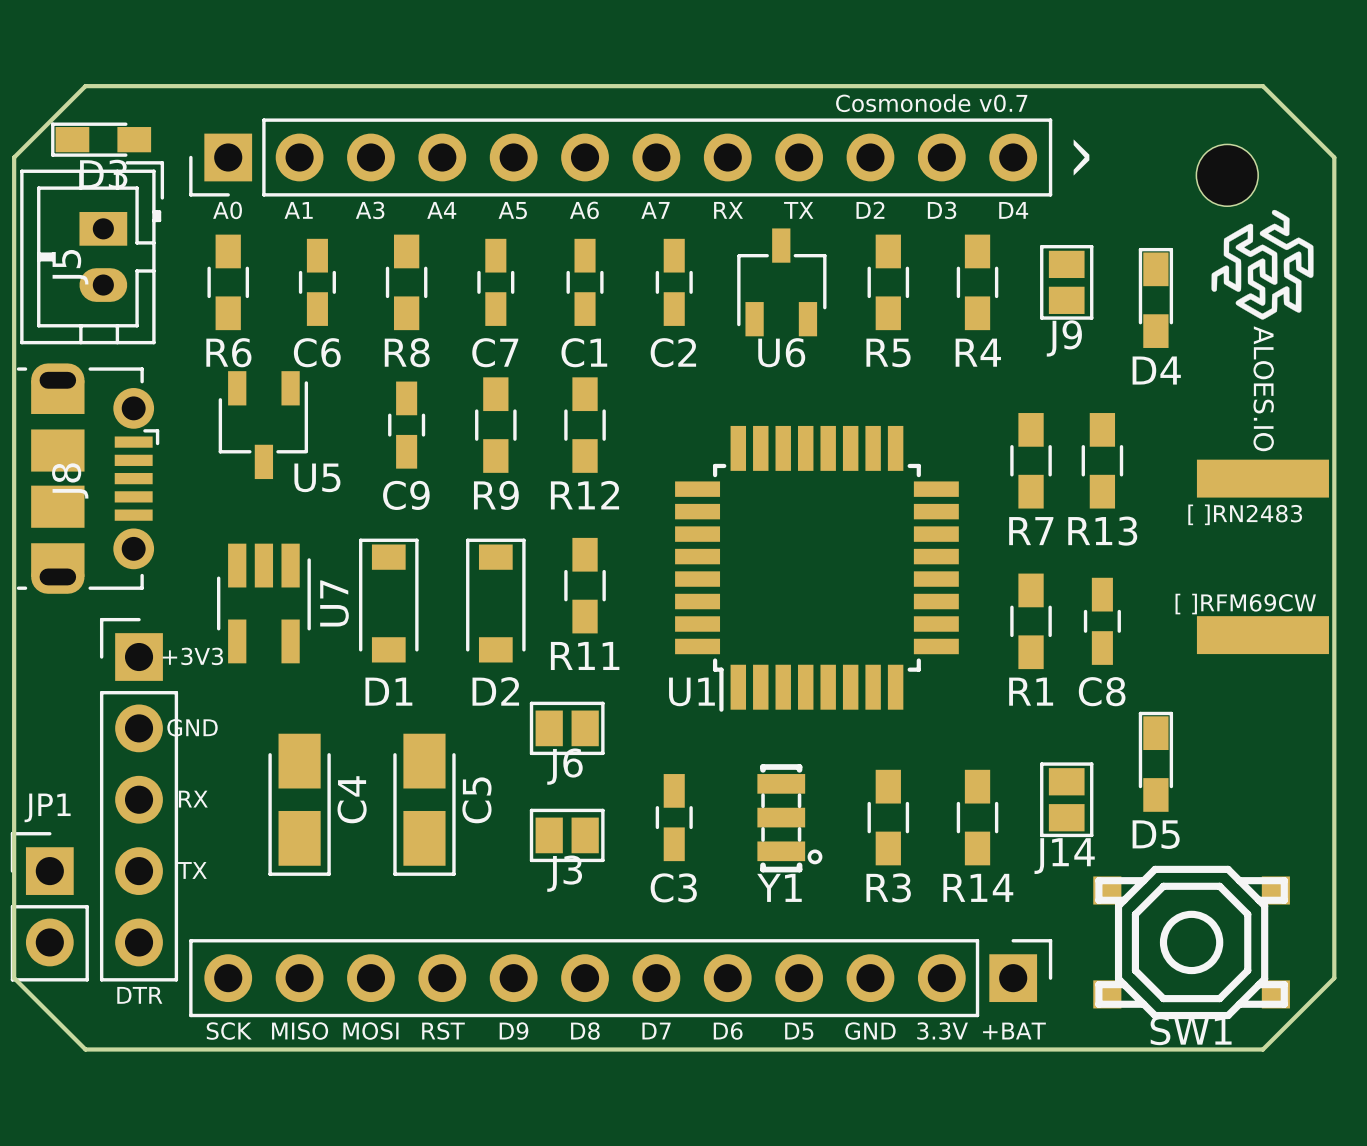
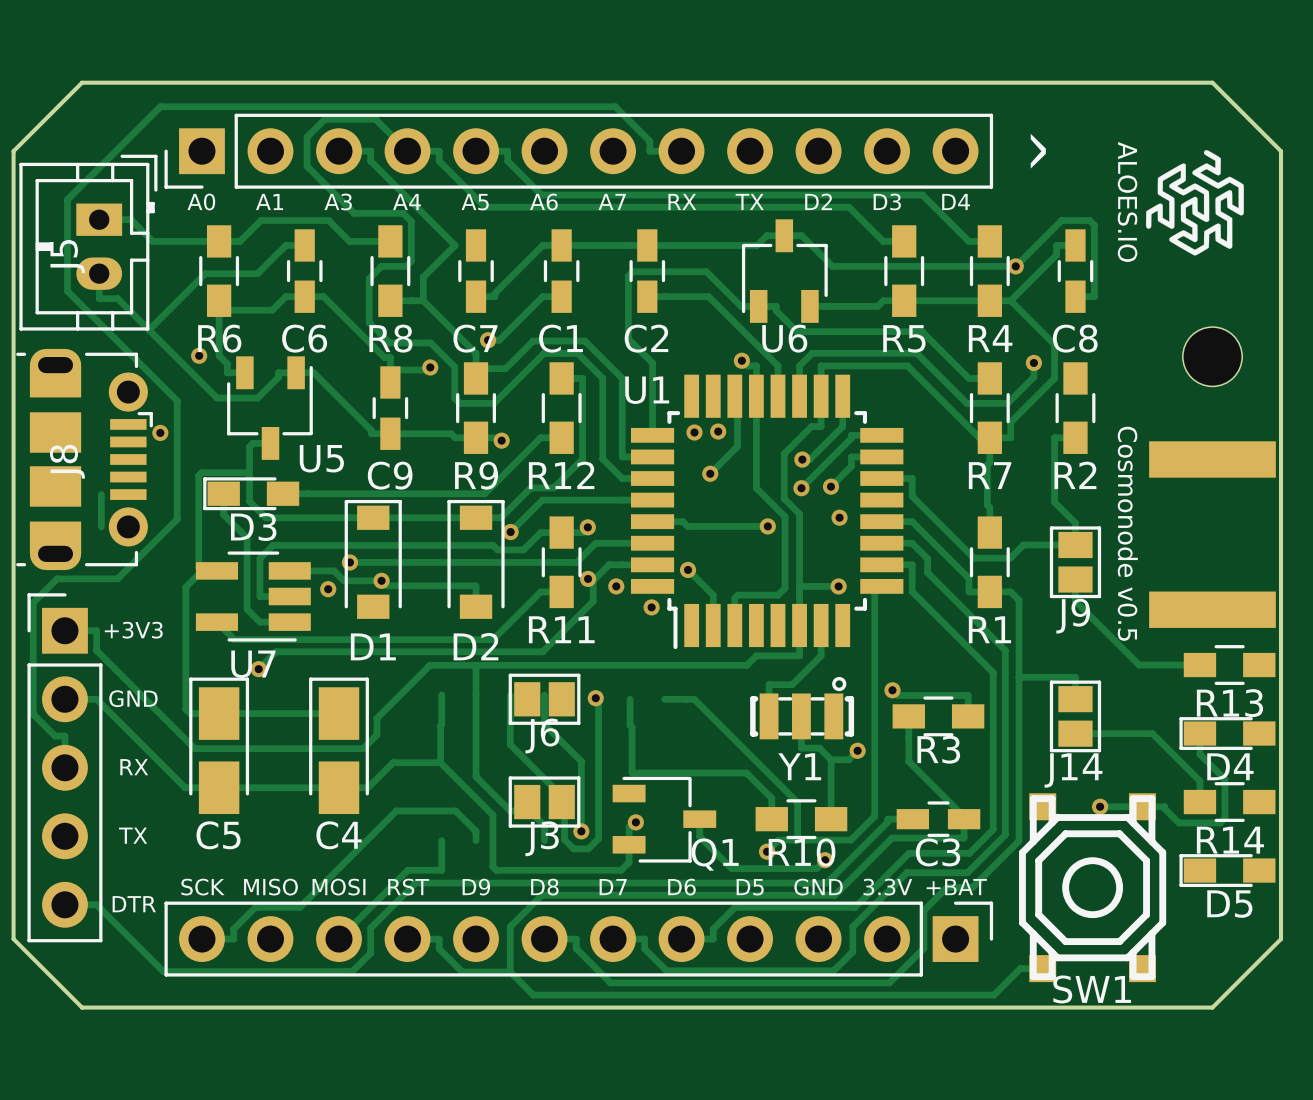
text: Cosmonode v0.7 (931, 103) -> none
D3 position: (101, 139) -> (251, 493)
track: none -> (339, 151) (370, 151) (370, 161) (455, 245) (423, 277) (423, 300)
track: none -> (476, 151) (507, 151) (507, 161) (541, 195) (922, 195) (968, 241) (989, 241)
part position: (620, 157) -> (578, 151)
track: none -> (681, 151) (649, 151) (649, 141) (615, 106) (160, 106) (67, 199) (67, 291) (177, 400) (177, 519) (117, 578) (57, 578) (33, 602) (33, 714) (55, 736) (64, 736) (64, 767)
part position: (1227, 175) -> (1212, 356)
text position: A0 (227, 210) -> A0 (201, 201)
text position: A1 (298, 210) -> A1 (269, 201)
text position: A3 (370, 210) -> A3 (338, 201)
text position: A4 (441, 210) -> A4 (406, 201)
text position: A5 (512, 210) -> A5 (475, 202)
text position: A6 (584, 210) -> A6 (543, 201)
text position: A7 (655, 210) -> A7 (612, 201)
text position: RX (728, 210) -> RX (682, 201)
text position: TX (798, 210) -> TX (749, 201)
text position: D2 (870, 210) -> D2 (818, 201)
text position: D3 (942, 210) -> D3 (887, 201)
text position: D4 (1013, 210) -> D4 (956, 201)
track: none -> (99, 219) (130, 219) (152, 241) (240, 241) (260, 220) (328, 220) (349, 241) (390, 241)
track: none -> (904, 241) (883, 241) (849, 207) (485, 207) (439, 161) (439, 151) (407, 151) (375, 119) (324, 119) (307, 137) (307, 166) (354, 213) (403, 213) (411, 221) (411, 261) (406, 266) (381, 266) (369, 278) (369, 322) (389, 342) (430, 342) (454, 367) (454, 398) (459, 403) (494, 403) (543, 353) (577, 353) (602, 378) (602, 459) (622, 478) (652, 478)
track: none -> (304, 245) (285, 245) (257, 273) (205, 273) (149, 329)
track: none -> (1075, 245) (1056, 245) (1056, 254) (1010, 300)
drawing position: (1262, 264) -> (1194, 202)
via: none -> (1015, 266)
U6 position: (781, 282) -> (784, 271)
R5 position: (888, 282) -> (904, 271)
R4 position: (977, 282) -> (989, 271)
J9 position: (1066, 282) -> (1075, 562)
track: none -> (99, 273) (99, 298) (117, 298) (217, 398) (257, 398) (278, 377) (278, 372) (313, 372) (371, 430) (371, 433) (451, 433) (455, 437) (496, 437) (501, 440)
D4 rotation: 0° (1155, 297) -> 90° counterclockwise (1227, 733)
D4 position: (1155, 297) -> (1227, 733)
track: none -> (476, 296) (494, 296) (494, 293) (542, 245) (757, 245) (766, 235) (801, 235) (832, 266) (1015, 266) (1061, 220) (1089, 220) (1094, 225) (1094, 296) (1075, 296)
track: none -> (561, 296) (542, 296) (499, 340) (488, 340)
track: none -> (647, 296) (708, 296) (777, 365) (777, 396)
track: none -> (219, 300) (219, 355) (227, 364) (227, 372) (244, 372)
track: none -> (390, 300) (423, 300)
track: none -> (423, 300) (476, 353) (476, 378)
track: none -> (1010, 300) (883, 300) (877, 306) (809, 306)
track: none -> (1010, 300) (1054, 344) (1054, 378) (1010, 422) (1010, 437) (979, 437) (907, 365) (821, 365) (821, 426) (811, 426) (784, 453) (784, 498) (799, 514) (799, 655) (756, 655) (746, 665) (429, 665) (376, 718) (376, 734) (363, 748) (194, 748) (96, 650) (96, 630) (64, 630)
track: none -> (219, 310) (272, 310) (285, 296) (323, 296) (384, 357) (390, 357) (390, 382)
via: none -> (488, 340)
via: none -> (199, 355)
track: none -> (741, 360) (747, 365) (756, 365) (756, 488) (785, 516) (785, 588) (777, 595) (737, 595) (734, 598) (734, 625)
via: none -> (741, 360)
track: none -> (1033, 362) (1033, 377) (1007, 403) (966, 403) (916, 353) (812, 353) (799, 365) (799, 396)
via: none -> (1033, 362)
track: none -> (430, 367) (427, 370) (390, 370)
via: none -> (430, 367)
track: none -> (476, 368) (505, 368) (533, 341) (584, 341) (622, 378) (622, 456) (652, 456)
text position: ALOES.IO (1263, 388) -> ALOES.IO (1127, 201)
track: none -> (561, 378) (582, 378) (582, 459) (553, 487) (530, 487) (500, 517) (265, 517) (249, 501) (249, 446) (252, 443) (270, 443)
track: none -> (989, 378) (968, 378) (922, 331) (797, 331) (776, 310) (776, 306) (741, 306) (706, 271) (632, 271) (628, 276) (628, 339) (652, 363) (652, 435)
track: none -> (734, 396) (737, 398) (737, 446) (710, 473)
track: none -> (842, 396) (842, 426) (809, 459) (802, 459)
U5 position: (263, 425) -> (269, 408)
R2: none -> (1075, 408)
via: none -> (718, 431)
via: none -> (160, 432)
via: none -> (694, 432)
track: none -> (881, 435) (851, 435) (851, 438) (801, 488)
track: none -> (561, 437) (540, 437) (484, 493) (283, 493)
track: none -> (989, 437) (989, 462) (987, 465) (989, 532)
track: none -> (1075, 437) (1054, 437) (1054, 502) (1075, 523) (1075, 545) (1023, 545) (1010, 558) (973, 558) (912, 496) (912, 478) (881, 478)
via: none -> (501, 440)
R7 position: (1031, 460) -> (989, 408)
R13 rotation: 0° (1102, 460) -> 90° clockwise (1229, 665)
R13 position: (1102, 460) -> (1229, 665)
track: none -> (881, 456) (851, 456) (851, 466) (830, 486)
via: none -> (802, 459)
track: none -> (249, 472) (201, 472) (198, 475) (198, 567) (202, 570)
via: none -> (710, 473)
via: none -> (830, 486)
via: none -> (801, 488)
track: none -> (223, 493) (223, 514) (247, 538) (247, 609) (259, 622) (289, 622)
text: [ ]RN2483 (1245, 514) -> none
track: none -> (101, 494) (101, 526)
track: none -> (652, 500) (542, 500) (510, 532)
via: none -> (839, 517)
track: none -> (652, 521) (682, 521) (687, 526) (767, 526)
track: none -> (881, 521) (912, 521) (968, 578) (968, 591) (1010, 591) (1018, 600) (1018, 841) (972, 887) (946, 887) (923, 910) (923, 948) (889, 982) (610, 982) (576, 948) (576, 939) (544, 939)
via: none -> (767, 526)
track: none -> (587, 527) (582, 532) (540, 532) (523, 549) (497, 549) (493, 545) (272, 545) (259, 558) (259, 596) (289, 596)
via: none -> (587, 527)
via: none -> (510, 532)
text: none -> Cosmonode v0.5 (1127, 533)
track: none -> (652, 543) (595, 543) (576, 562) (349, 562)
track: none -> (881, 543) (912, 543) (927, 558) (927, 572) (1005, 650) (1005, 834) (967, 872) (906, 872) (852, 926) (852, 951) (833, 970) (666, 970) (644, 948) (644, 939) (613, 939)
U1 position: (816, 568) -> (767, 511)
via: none -> (349, 562)
track: none -> (652, 564) (609, 564) (593, 580)
track: none -> (881, 564) (912, 564) (912, 591) (993, 672) (993, 829) (969, 853) (909, 853) (855, 907) (735, 907) (713, 929) (713, 939) (681, 939)
track: none -> (688, 569) (713, 595) (713, 625)
via: none -> (688, 569)
track: none -> (202, 570) (185, 587) (185, 709) (190, 713) (339, 713)
track: none -> (289, 570) (334, 570) (344, 580) (381, 580) (386, 585) (476, 585) (476, 606)
D1 position: (388, 600) -> (373, 559)
D2 position: (495, 600) -> (476, 559)
U7 rotation: 0° (263, 603) -> 90° clockwise (253, 596)
via: none -> (588, 578)
track: none -> (1075, 579) (1075, 601) (1139, 665) (1199, 665)
via: none -> (381, 580)
track: none -> (593, 580) (593, 601) (542, 651) (276, 651) (258, 669)
text: [ ]RFM69CW (1245, 604) -> none
via: none -> (616, 586)
track: none -> (799, 586) (838, 586)
via: none -> (838, 586)
track: none -> (881, 586) (874, 593) (874, 816) (850, 840) (778, 840) (767, 851)
via: none -> (328, 589)
track: none -> (561, 591) (540, 591) (492, 639) (234, 639) (216, 622)
R1 position: (1031, 621) -> (989, 562)
C8 position: (1102, 621) -> (1075, 271)
via: none -> (651, 607)
track: none -> (821, 625) (821, 655) (792, 684) (769, 684) (769, 716)
text position: +3V3 (192, 656) -> +3V3 (133, 630)
U1 name position: U1 (691, 691) -> U1 (647, 390)
track: none -> (476, 665) (476, 776) (510, 810) (529, 810) (544, 825) (544, 840)
via: none -> (258, 669)
track: none -> (1018, 677) (1075, 677) (1075, 699)
track: none -> (892, 690) (897, 695) (968, 695) (968, 716)
via: none -> (892, 690)
track: none -> (441, 694) (440, 762)
track: none -> (510, 694) (510, 744) (564, 798) (564, 839) (573, 848) (588, 848) (598, 838) (598, 701) (595, 698)
track: none -> (544, 694) (544, 724) (581, 761) (581, 831)
text position: GND (192, 727) -> GND (133, 698)
via: none -> (595, 698)
track: none -> (64, 699) (96, 699) (185, 787) (368, 787) (393, 762) (440, 762)
track: none -> (630, 699) (632, 773) (746, 773) (771, 798) (771, 819)
track: none -> (664, 699) (694, 699) (797, 802) (797, 840)
track: none -> (801, 716) (801, 748) (819, 748) (831, 759)
track: none -> (908, 716) (908, 761) (964, 816) (964, 838) (892, 838) (834, 895) (541, 895) (510, 926) (510, 972)
D5 rotation: 0° (1155, 761) -> 90° counterclockwise (1227, 870)
D5 position: (1155, 761) -> (1227, 870)
track: none -> (1075, 733) (1152, 733) (1199, 781) (1199, 802)
track: none -> (1199, 733) (1199, 754) (1224, 779) (1224, 818) (1220, 822) (1178, 822) (1164, 806) (1100, 806)
track: none -> (857, 750) (848, 759) (831, 759)
via: none -> (857, 750)
track: none -> (831, 759) (831, 819)
track: none -> (440, 762) (492, 815) (492, 866) (496, 870) (621, 870) (629, 862) (629, 827) (635, 822)
part position: (139, 799) -> (64, 767)
text position: RX (193, 799) -> RX (134, 767)
C4 name position: C4 (352, 799) -> C4 (339, 835)
J14 position: (1066, 799) -> (1075, 716)
C5 name position: C5 (476, 800) -> C5 (218, 835)
C4 rotation: 0° (299, 804) -> 180° (339, 745)
C5 rotation: 0° (424, 804) -> 180° (219, 745)
C5 position: (424, 804) -> (219, 745)
C3 rotation: 0° (674, 817) -> 90° clockwise (938, 819)
C3 position: (674, 817) -> (938, 819)
R3 rotation: 0° (888, 817) -> 90° clockwise (938, 716)
R3 position: (888, 817) -> (938, 716)
R14 rotation: 0° (977, 817) -> 90° clockwise (1229, 802)
R14 position: (977, 817) -> (1229, 802)
Y1 rotation: 0° (789, 818) -> 90° counterclockwise (802, 708)
Y1 position: (789, 818) -> (802, 708)
via: none -> (1100, 806)
Q1: none -> (664, 819)
track: none -> (699, 819) (699, 836) (731, 868) (816, 868) (825, 860)
R10: none -> (801, 819)
track: none -> (912, 819) (887, 819) (887, 822) (826, 883) (415, 883) (370, 928) (370, 953) (352, 971) (163, 971) (96, 904) (64, 904)
via: none -> (635, 822)
via: none -> (581, 831)
text position: TX (192, 870) -> TX (133, 835)
track: none -> (441, 840) (441, 870) (407, 870) (339, 939)
track: none -> (476, 840) (476, 831) (455, 810) (396, 810) (299, 907) (255, 907) (233, 929) (233, 939) (201, 939)
via: none -> (767, 851)
via: none -> (825, 860)
JP1: (49, 906) -> none
SW1 rotation: 0° (1191, 942) -> 90° clockwise (1092, 887)
track: none -> (407, 939) (439, 939) (439, 948) (462, 972) (510, 972)
part position: (620, 978) -> (578, 939)
text position: DTR (139, 995) -> DTR (134, 904)
track: none -> (1042, 968) (1020, 968) (993, 995) (533, 995) (510, 972)
text position: SCK (229, 1031) -> SCK (202, 887)
text position: MISO (300, 1031) -> MISO (270, 887)
text position: MOSI (370, 1031) -> MOSI (339, 887)
text position: RST (443, 1031) -> RST (408, 887)
text position: D9 (513, 1031) -> D9 (476, 887)
text position: D8 (585, 1031) -> D8 (544, 887)
text position: D7 (656, 1031) -> D7 (613, 887)
text position: D6 (728, 1031) -> D6 (681, 887)
text position: D5 (799, 1031) -> D5 (750, 887)
text position: GND (870, 1031) -> GND (818, 887)
text position: 3.3V (942, 1031) -> 3.3V (887, 887)
text position: +BAT (1014, 1031) -> +BAT (956, 887)

